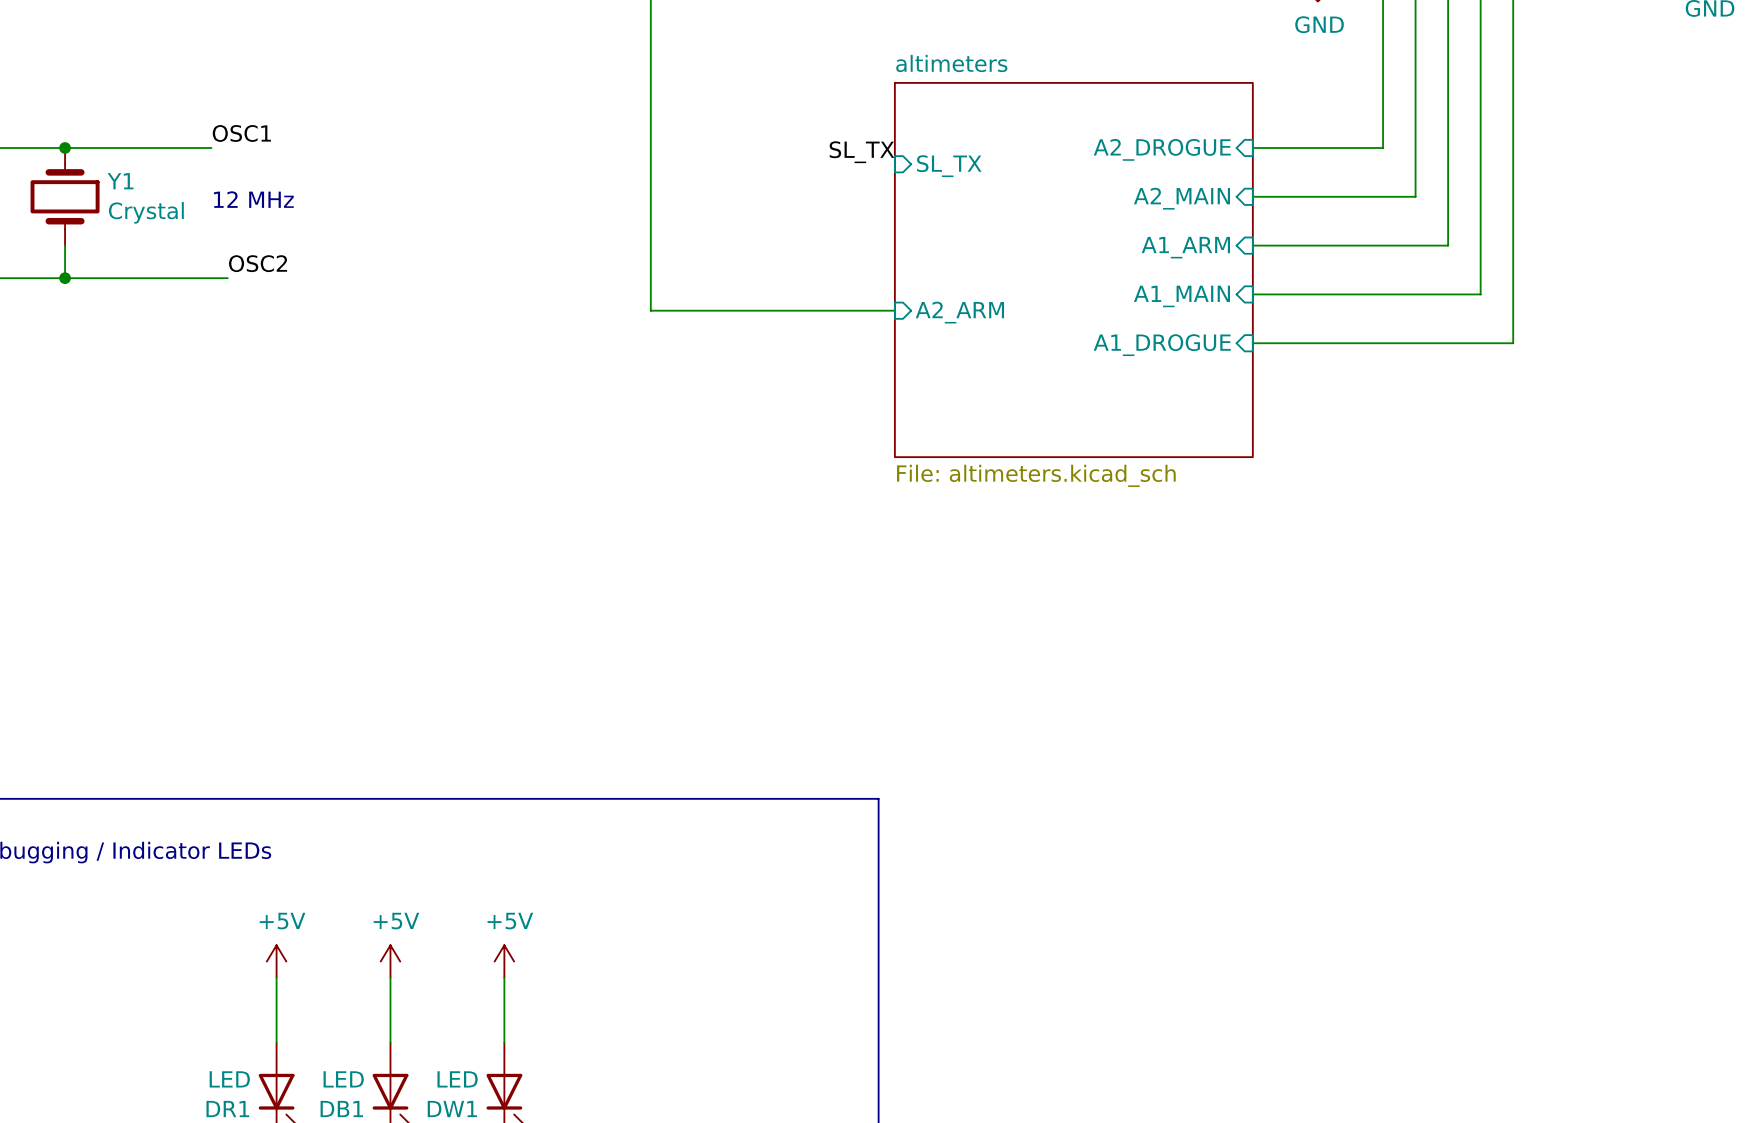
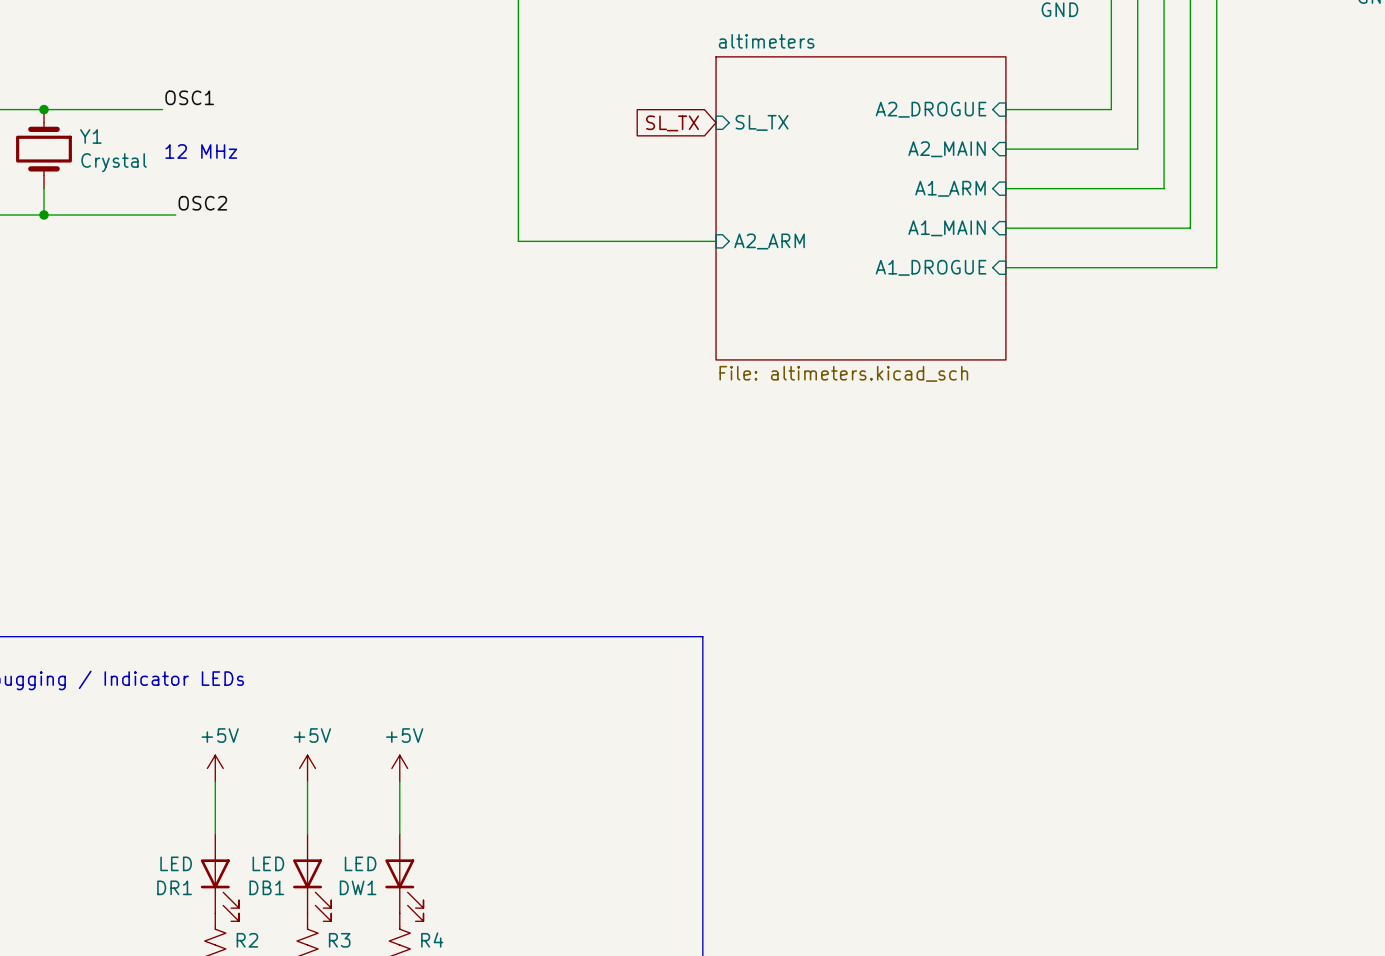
label: SL_TX (861, 152) -> none
global label: none -> SL_TX (672, 123)

